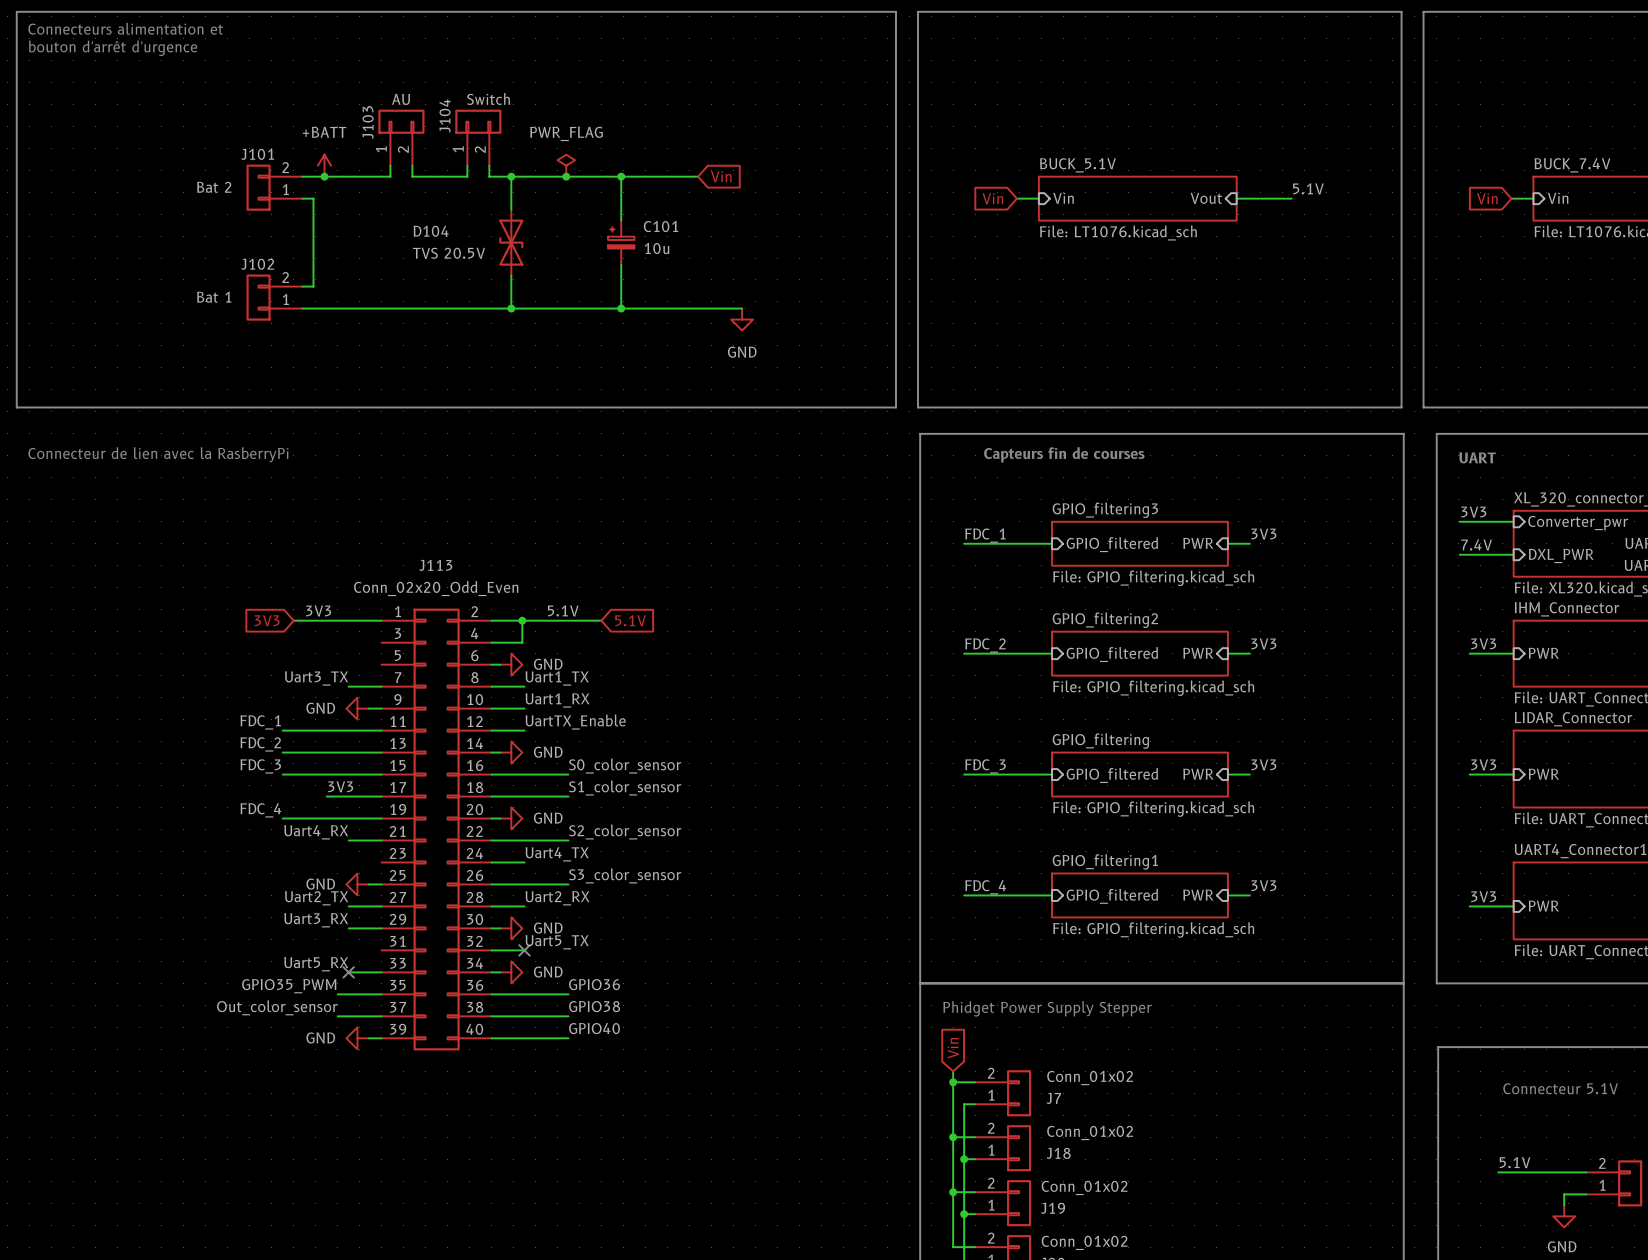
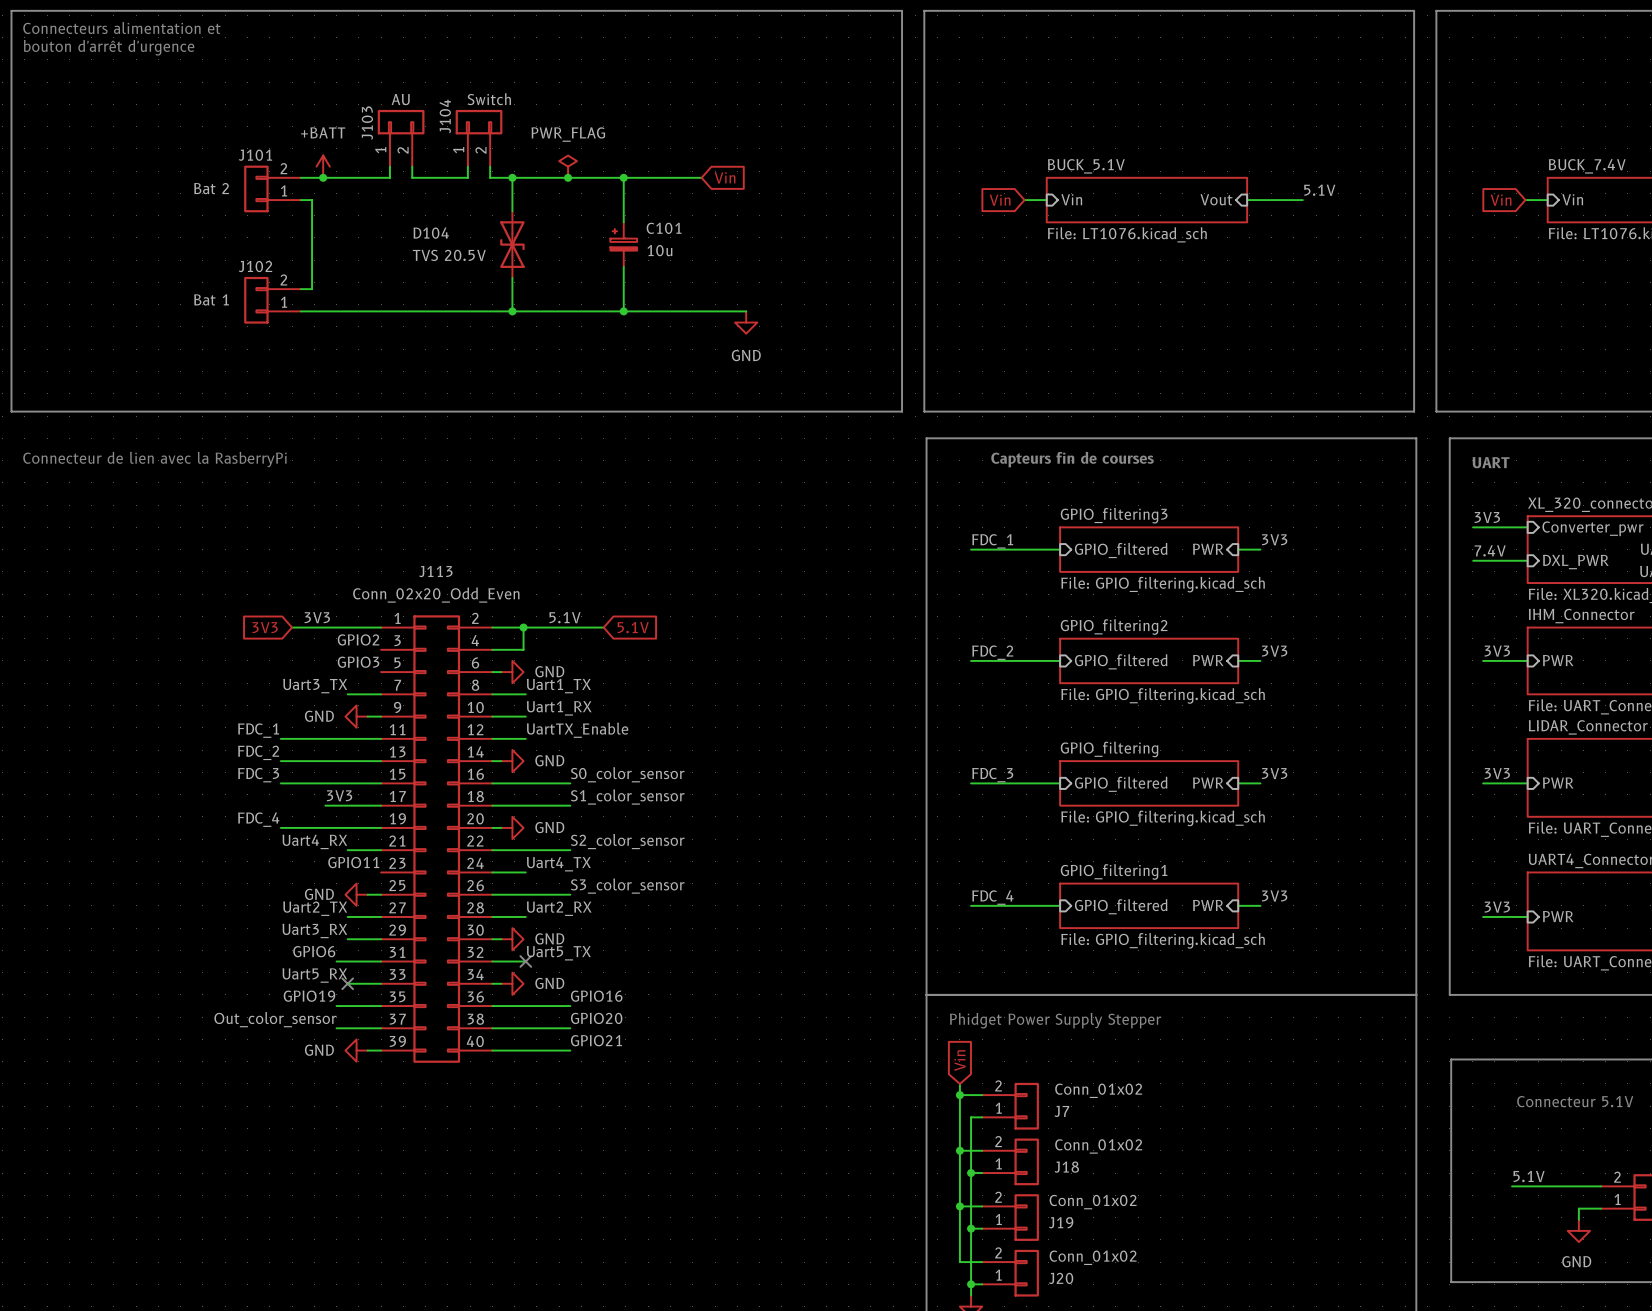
label: none -> GPIO2 (358, 639)
label: none -> GPIO3 (358, 662)
label: none -> GPIO11 (353, 862)
label: none -> GPIO6 (314, 951)
wire: none -> (336, 961) (381, 961)
label: GPIO36 (594, 984) -> GPIO16 (596, 996)
label: GPIO35_PWM (289, 986) -> GPIO19 (309, 996)
label: GPIO38 (594, 1006) -> GPIO20 (596, 1018)
label: GPIO40 (594, 1028) -> GPIO21 (596, 1040)

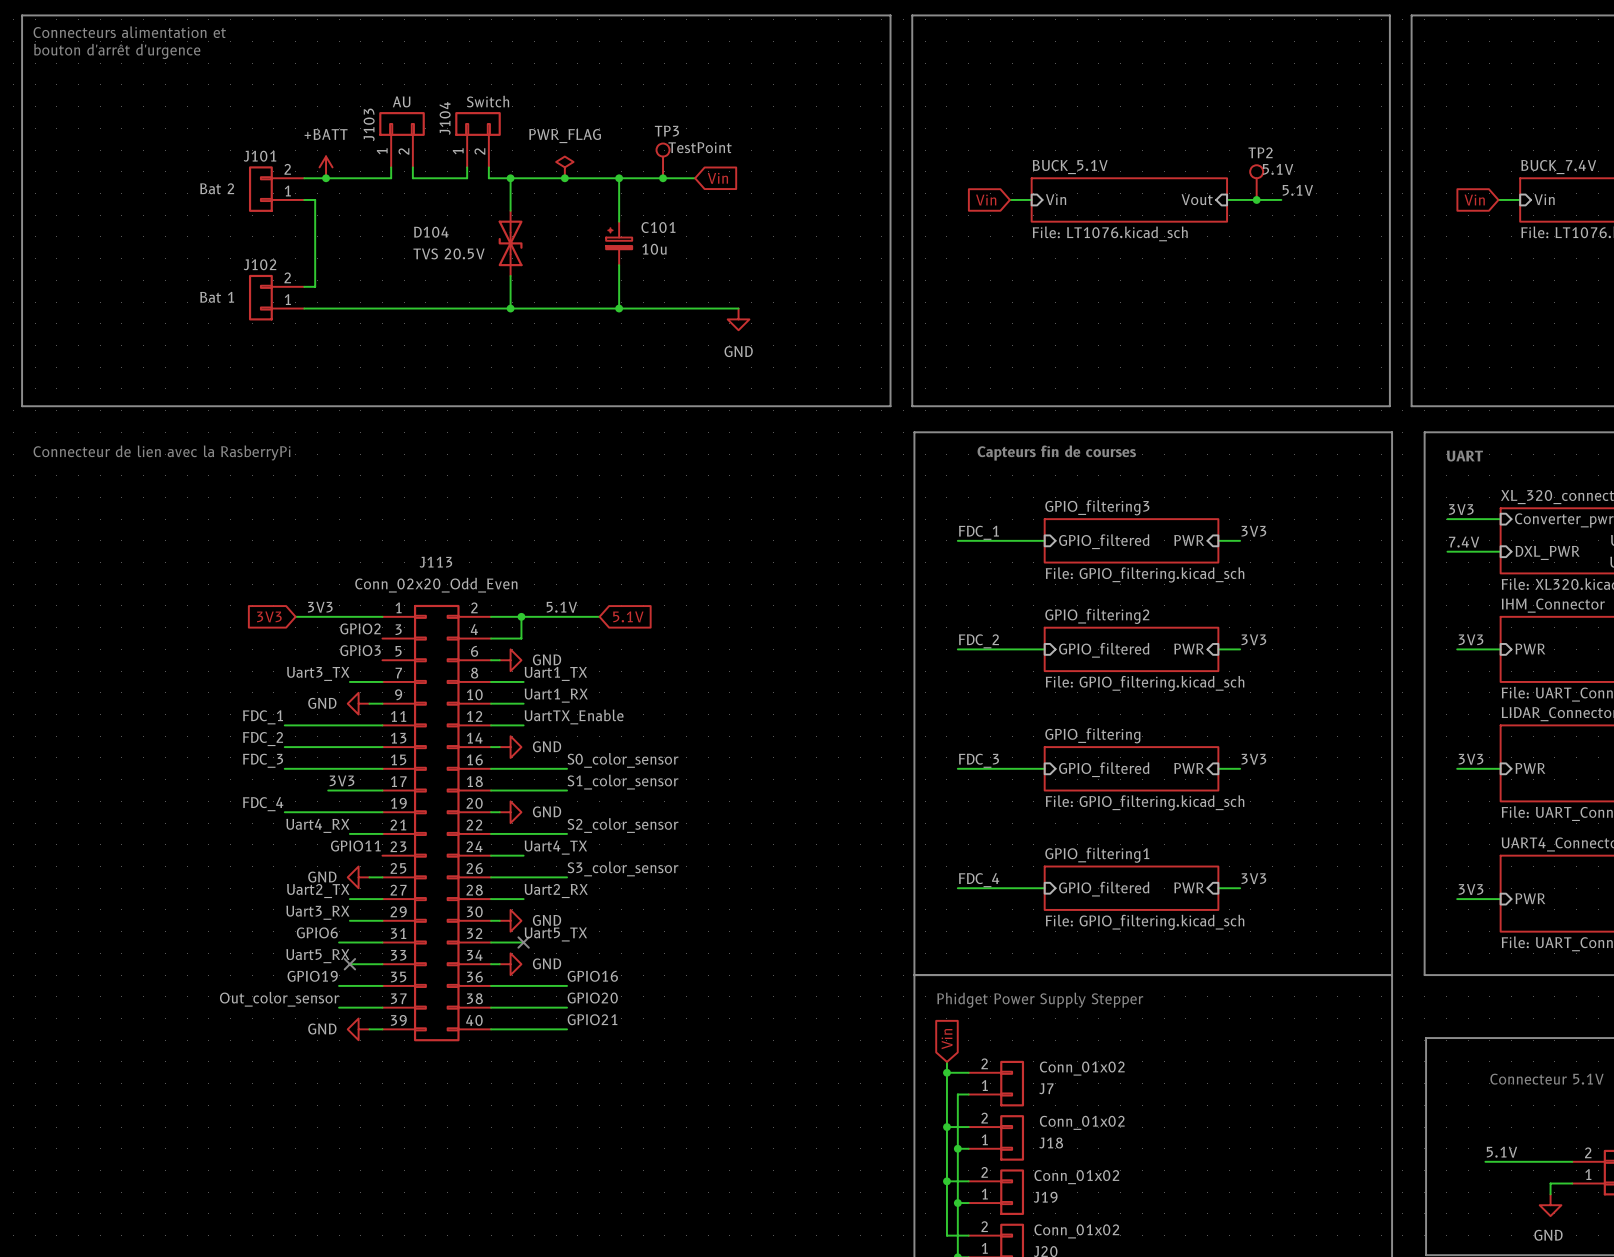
TP3: none -> TestPoint (663, 160)
junction: none -> (663, 178)
TP2: none -> 5.1V (1256, 182)
junction: none -> (1256, 199)

